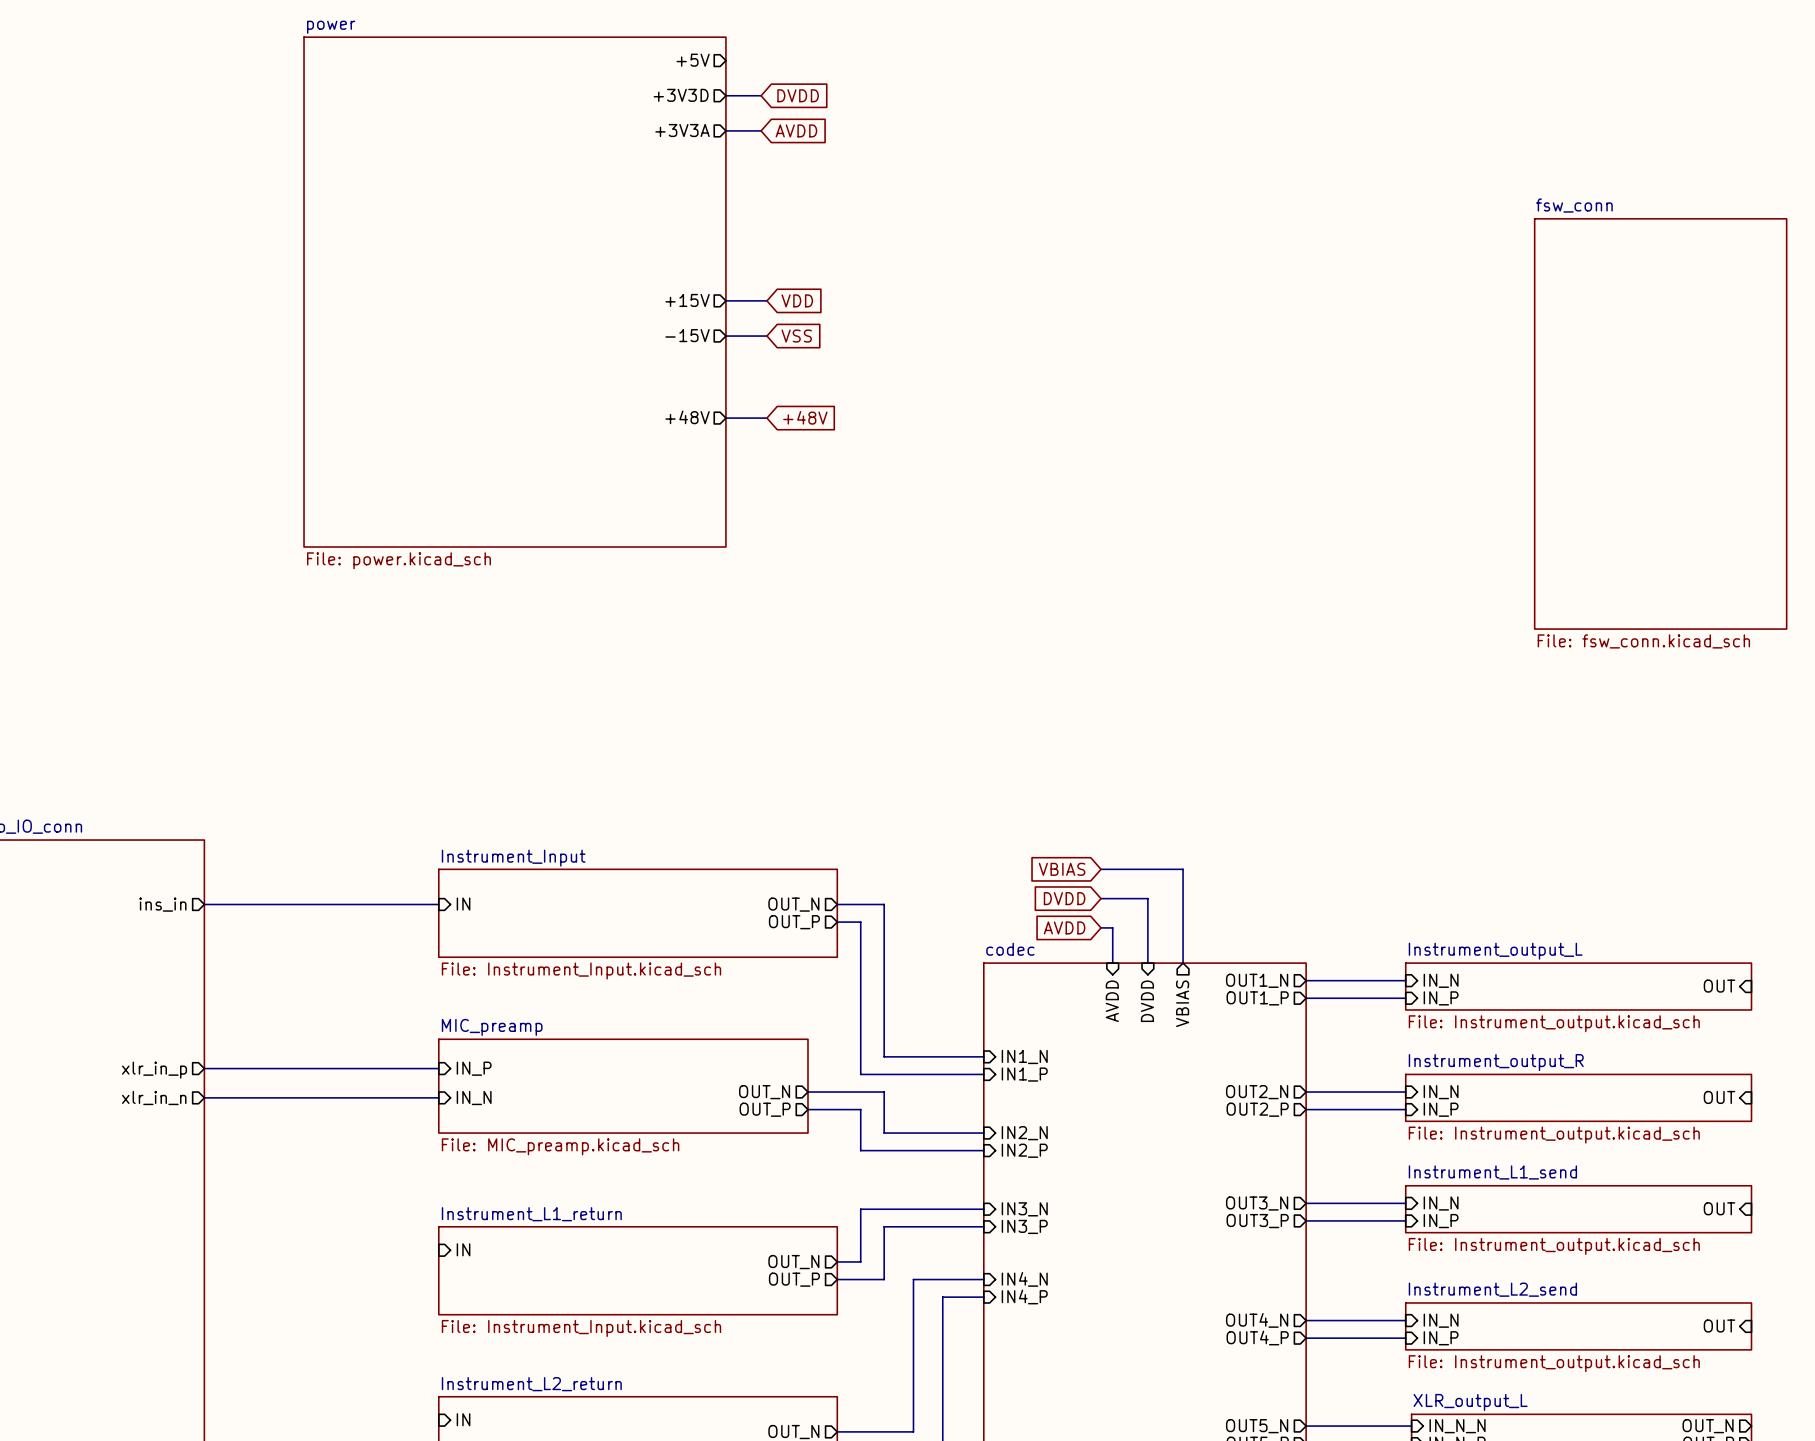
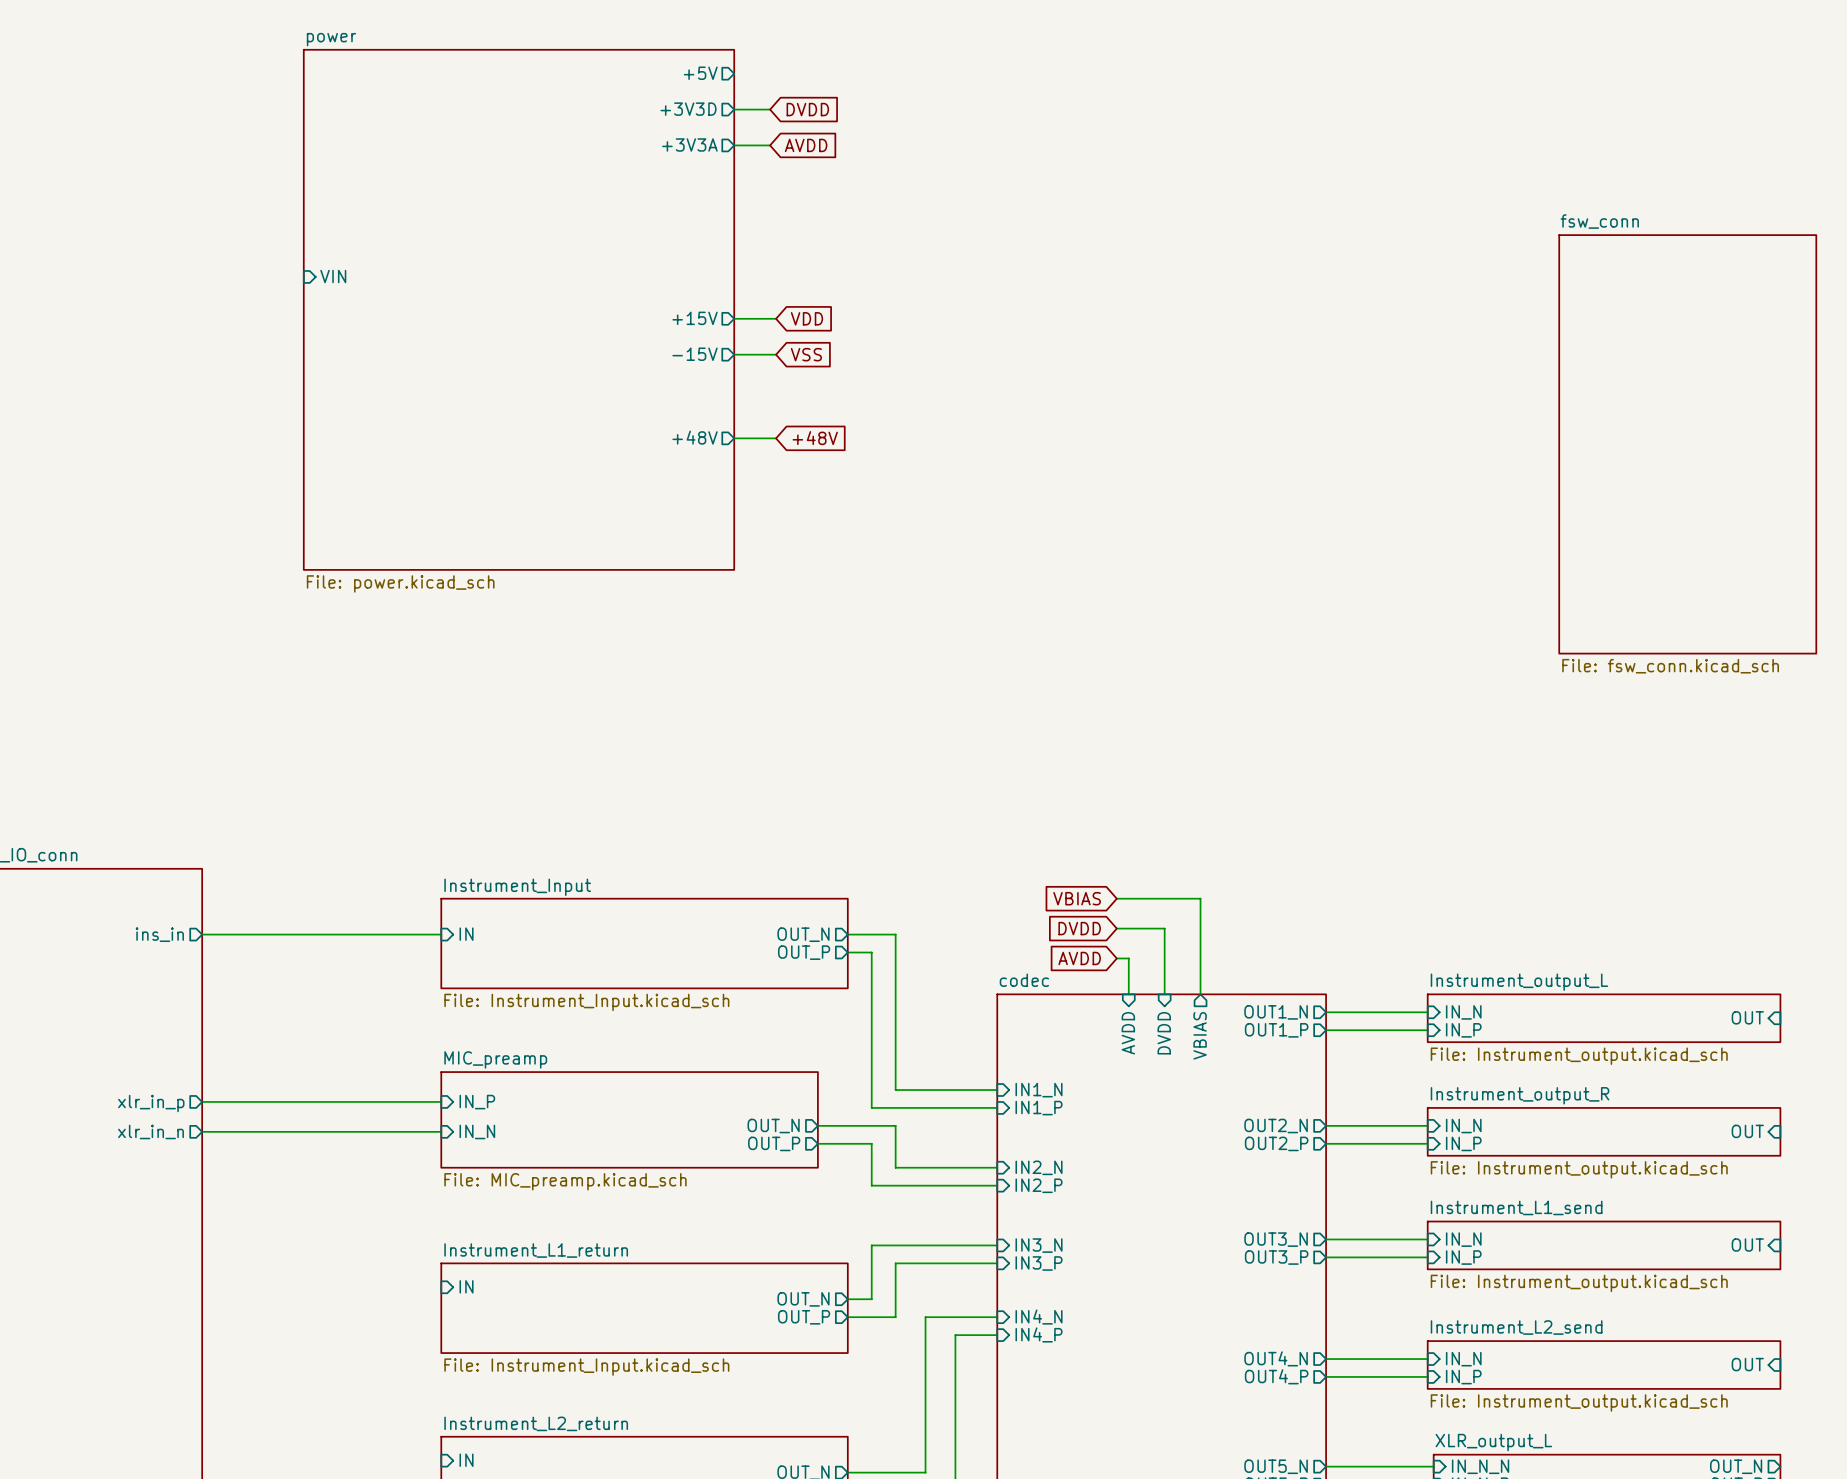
sheet pin: none -> VIN (333, 276)

